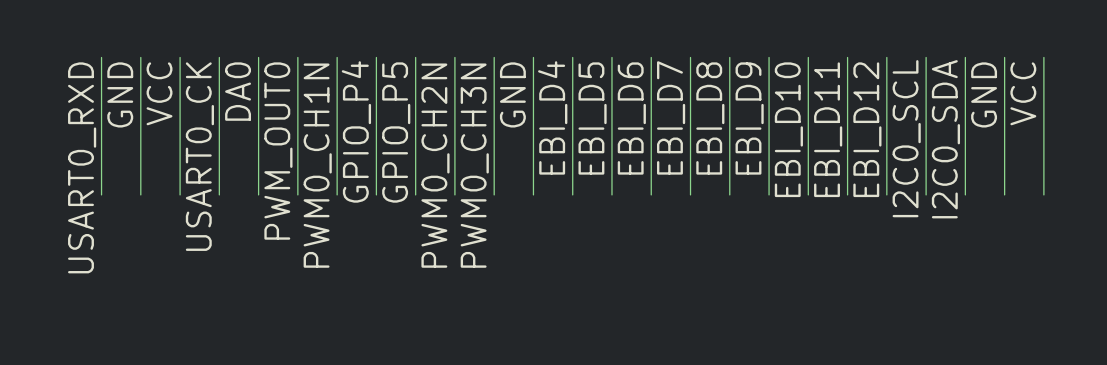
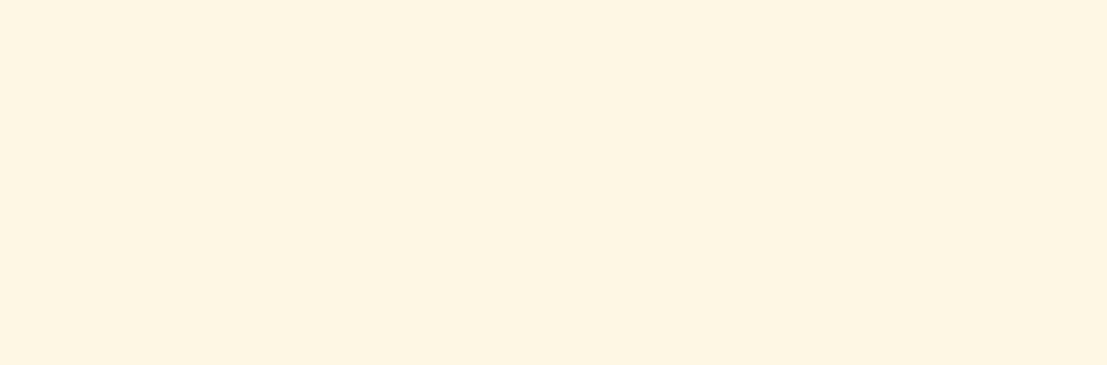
wire: (101, 57) (101, 194) -> none
wire: (140, 57) (140, 194) -> none
wire: (180, 57) (180, 194) -> none
wire: (219, 57) (219, 194) -> none
wire: (258, 57) (258, 194) -> none
wire: (297, 57) (297, 194) -> none
wire: (337, 57) (337, 194) -> none
wire: (376, 57) (376, 194) -> none
wire: (415, 57) (415, 194) -> none
wire: (454, 57) (454, 194) -> none
wire: (494, 57) (494, 194) -> none
wire: (533, 57) (533, 194) -> none
wire: (572, 57) (572, 194) -> none
wire: (611, 57) (611, 194) -> none
wire: (651, 57) (651, 194) -> none
wire: (690, 57) (690, 194) -> none
wire: (729, 57) (729, 194) -> none
wire: (769, 57) (769, 194) -> none
wire: (808, 57) (808, 194) -> none
wire: (847, 57) (847, 194) -> none
wire: (886, 57) (886, 194) -> none
wire: (926, 57) (926, 194) -> none
wire: (965, 57) (965, 194) -> none
wire: (1004, 57) (1004, 194) -> none
wire: (1043, 57) (1043, 194) -> none
label: DA0 (238, 91) -> none
label: VCC (159, 93) -> none
label: VCC (1023, 93) -> none
label: GND (120, 94) -> none
label: GND (512, 94) -> none
label: GND (984, 94) -> none
label: EBI_D4 (552, 117) -> none
label: EBI_D7 (671, 117) -> none
label: EBI_D5 (592, 118) -> none
label: EBI_D6 (631, 118) -> none
label: EBI_D8 (710, 118) -> none
label: EBI_D9 (749, 118) -> none
label: EBI_D10 (788, 129) -> none
label: EBI_D11 (828, 129) -> none
label: EBI_D12 (867, 129) -> none
label: GPIO_P4 (356, 131) -> none
label: GPIO_P5 (396, 132) -> none
label: I2C0_SCL (906, 138) -> none
label: I2C0_SDA (945, 139) -> none
label: PWM_OUT0 (278, 151) -> none
label: USART0_CK (199, 156) -> none
label: PWM0_CH1N (317, 165) -> none
label: PWM0_CH2N (435, 165) -> none
label: PWM0_CH3N (474, 165) -> none
label: USART0_RXD (82, 167) -> none

